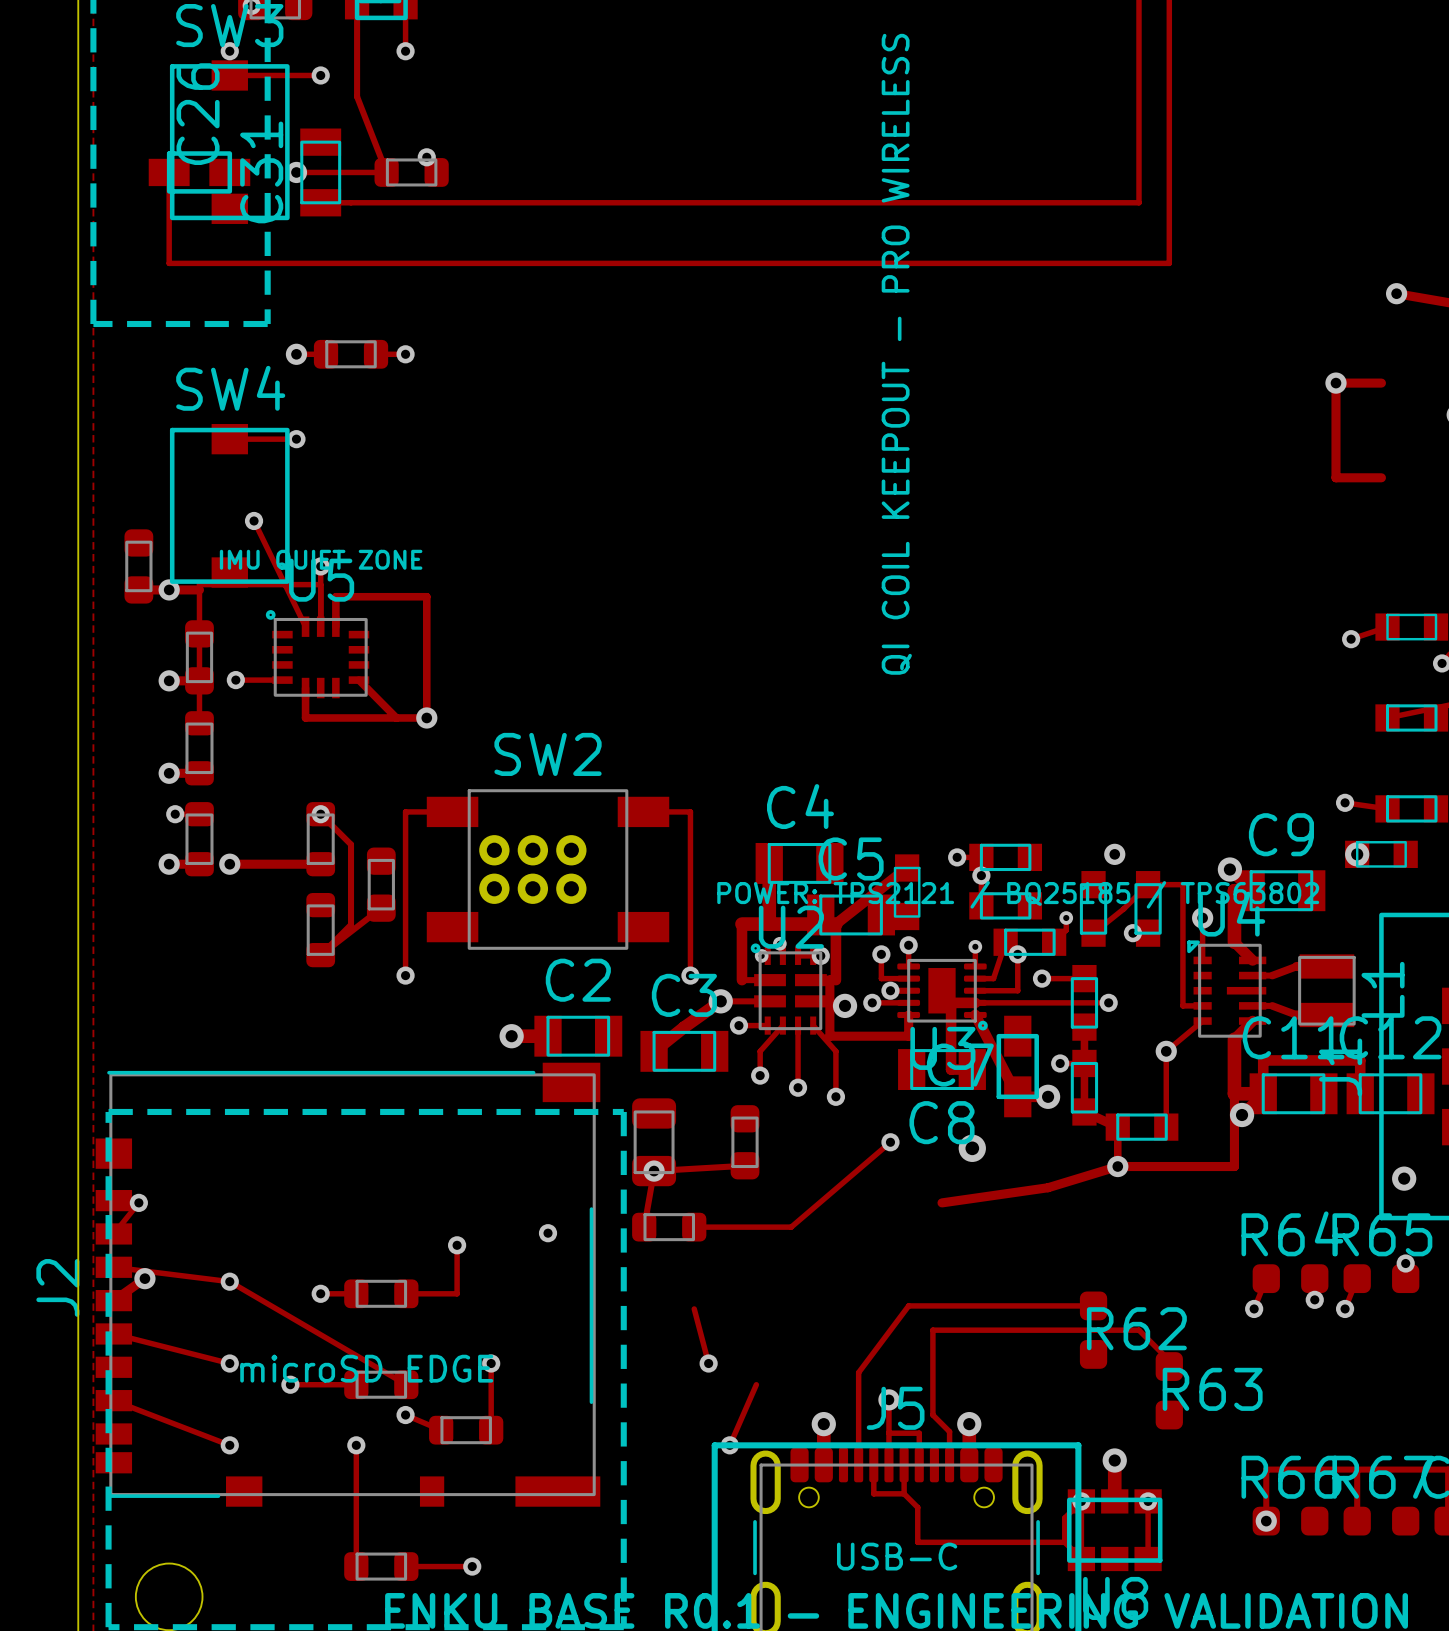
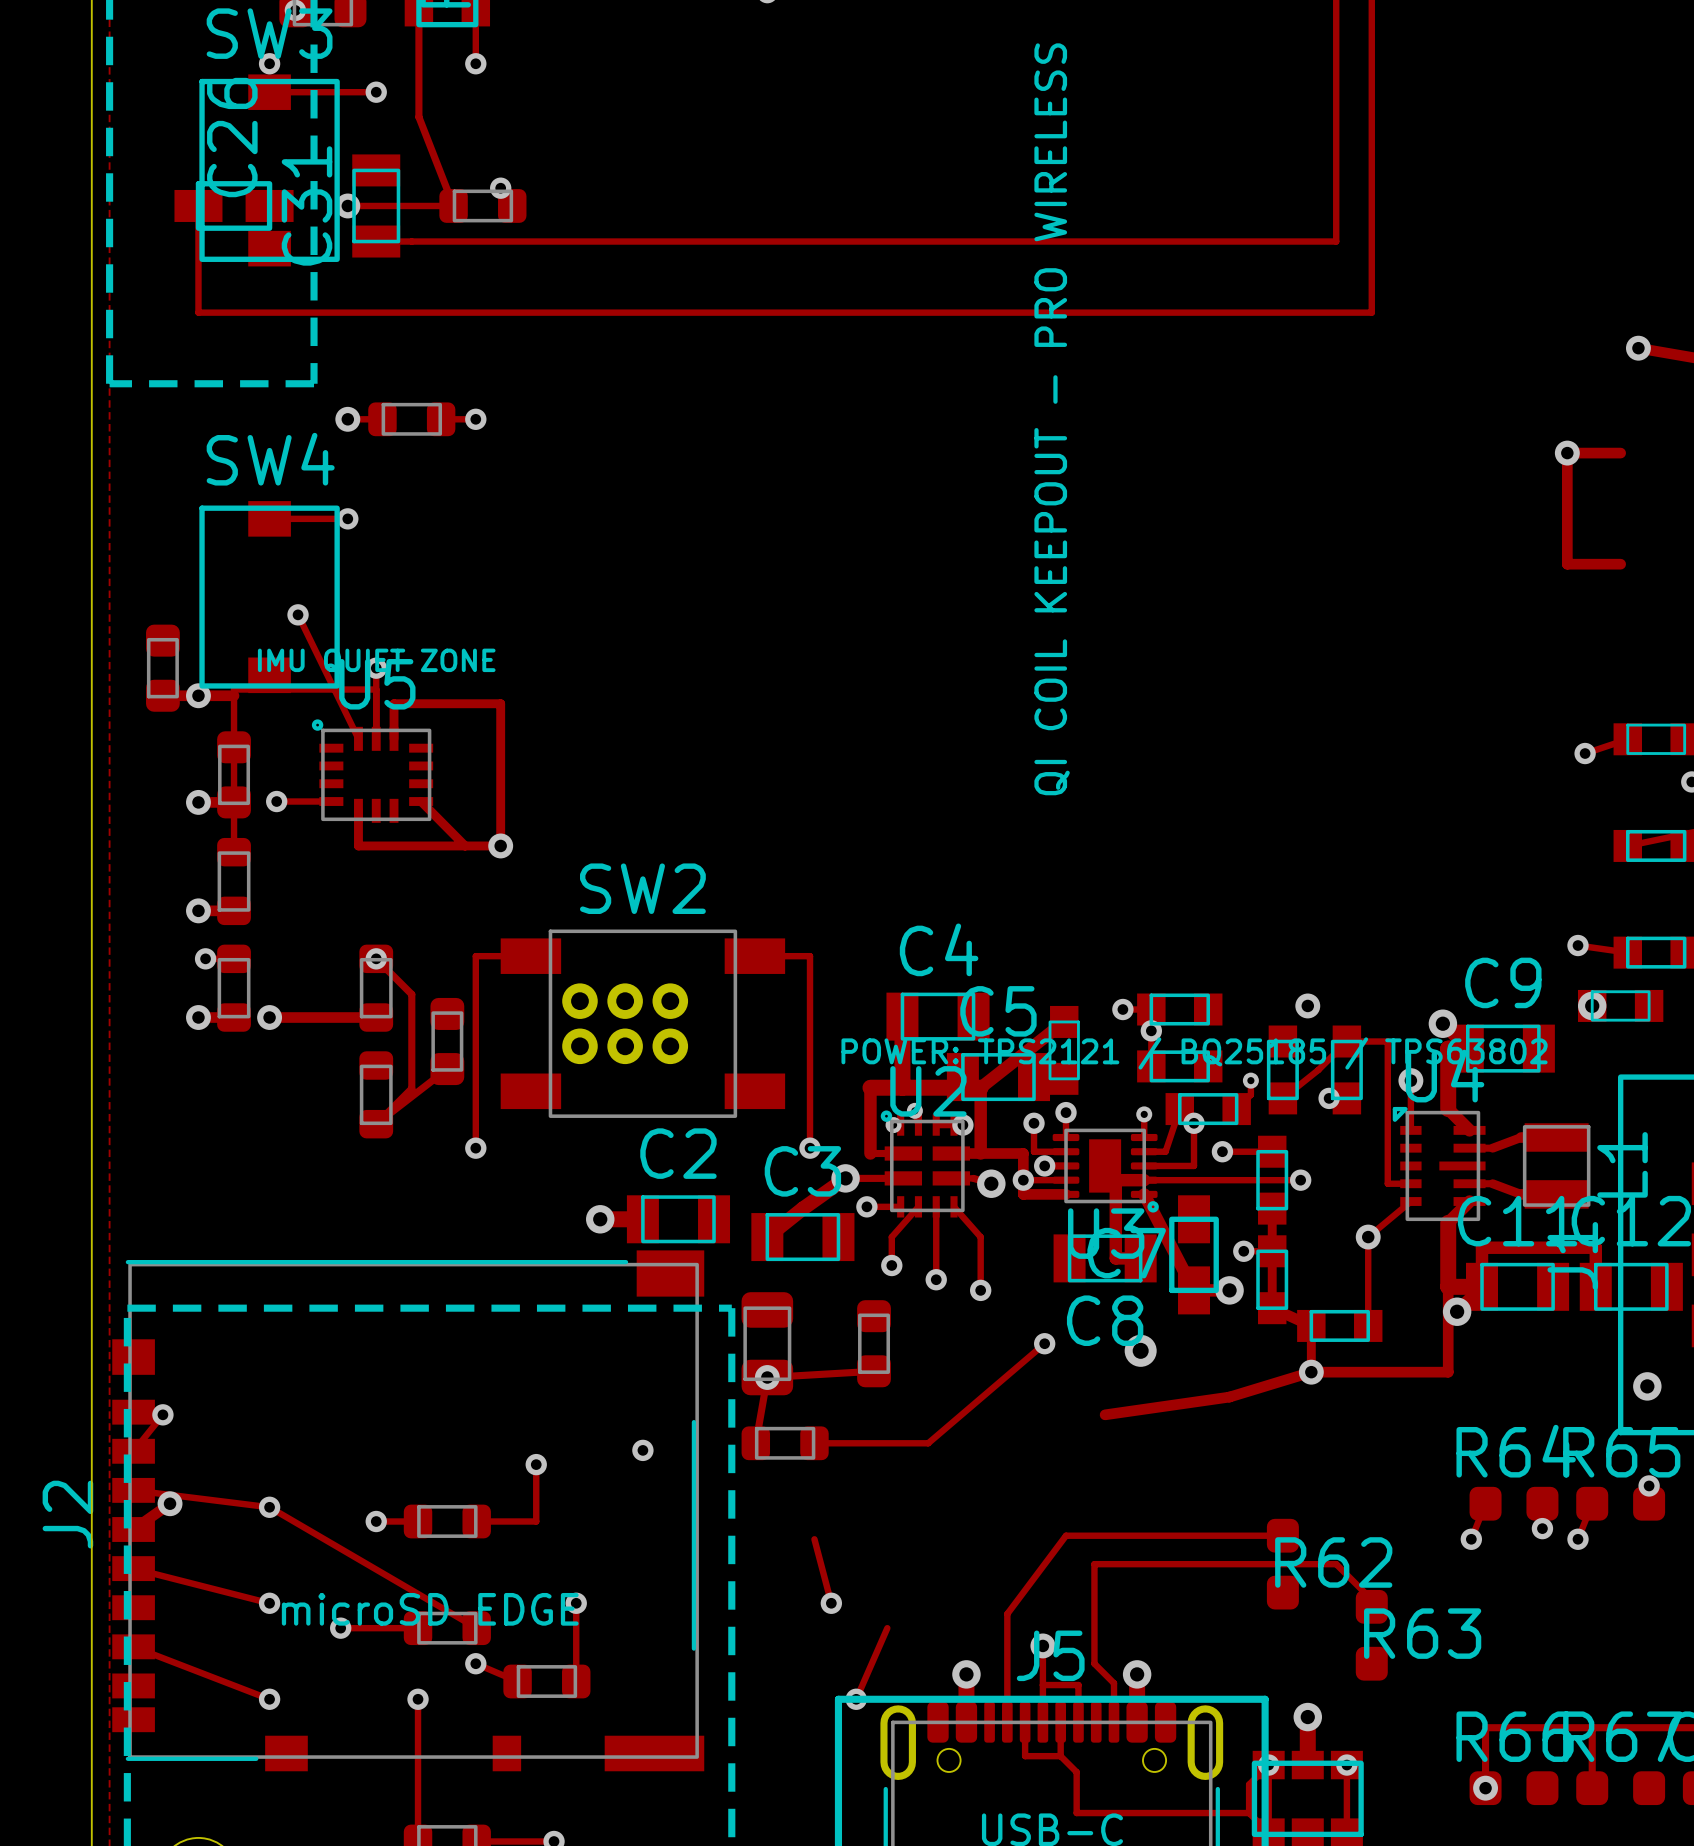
track: (829, 980) (829, 1036) (908, 1036) (908, 1014) -> (980, 1153) (1023, 1153) (1023, 1194) (1066, 1194)

